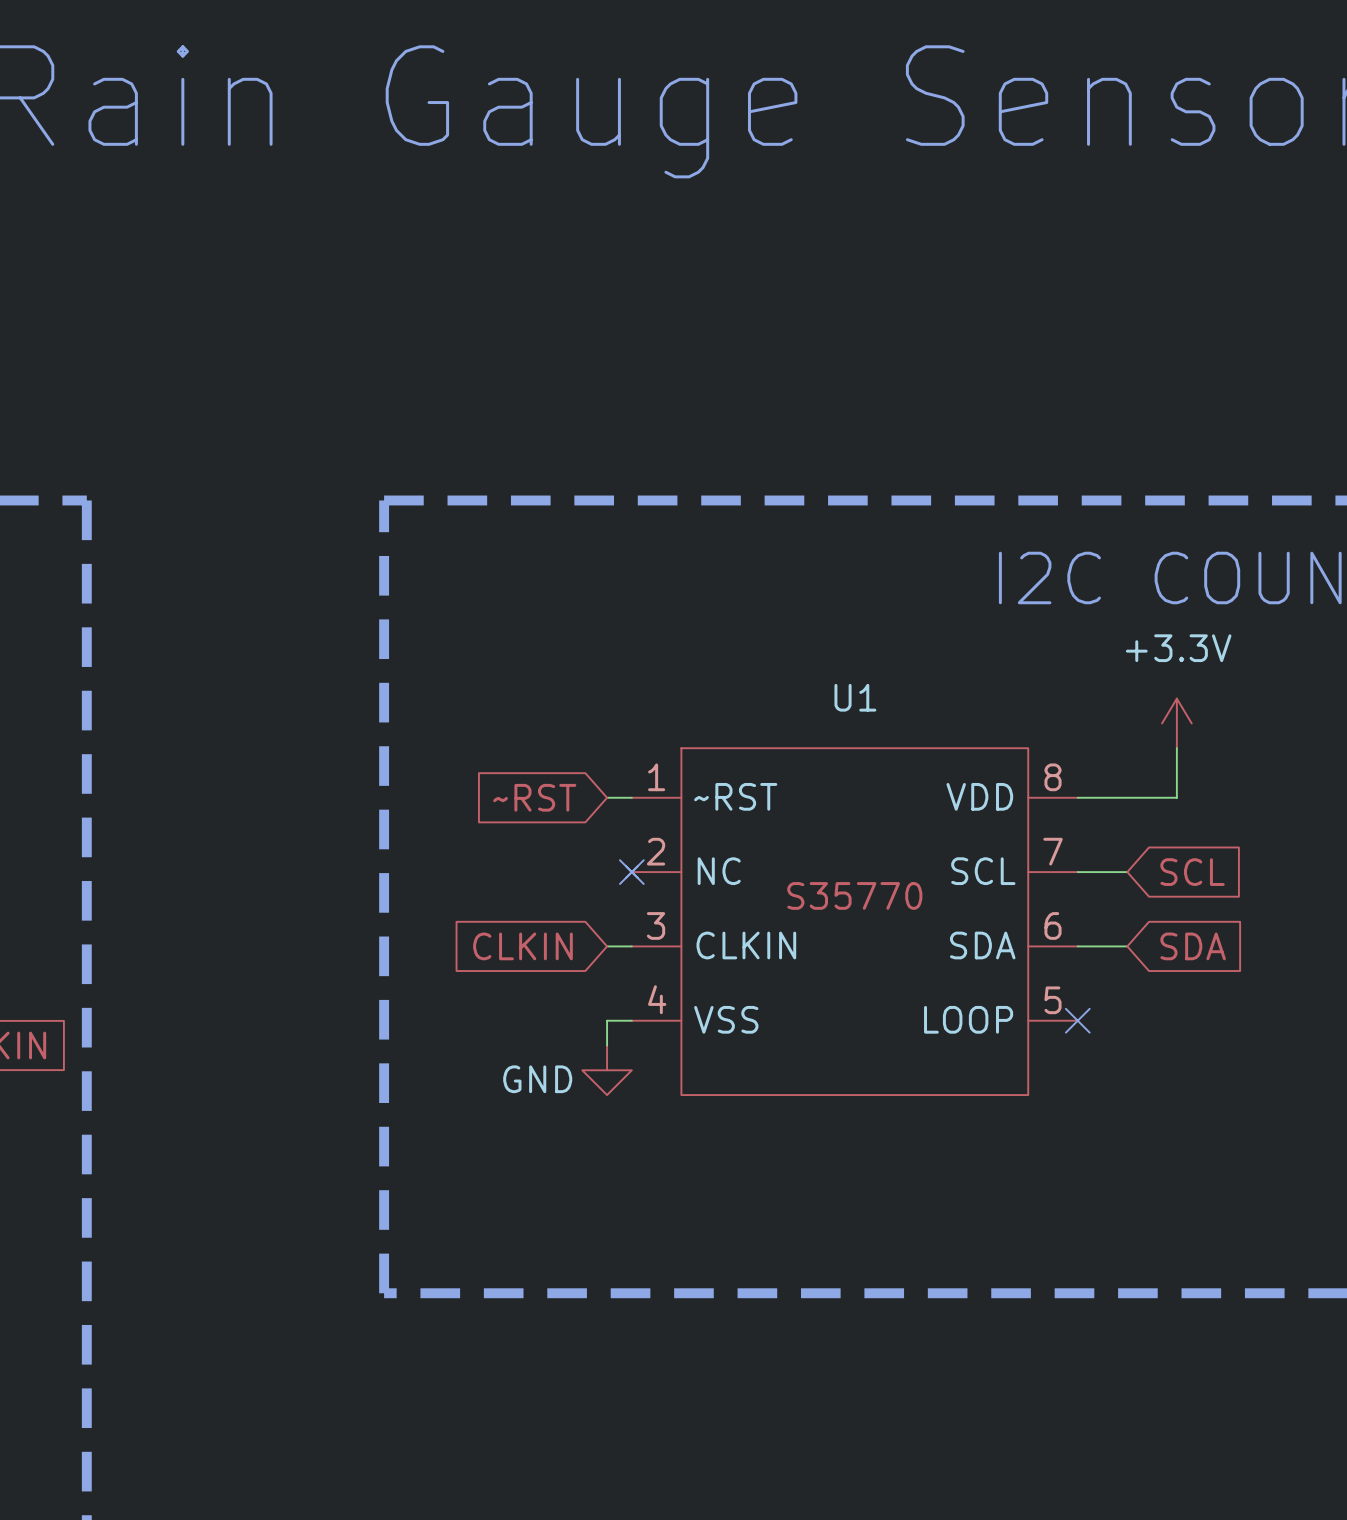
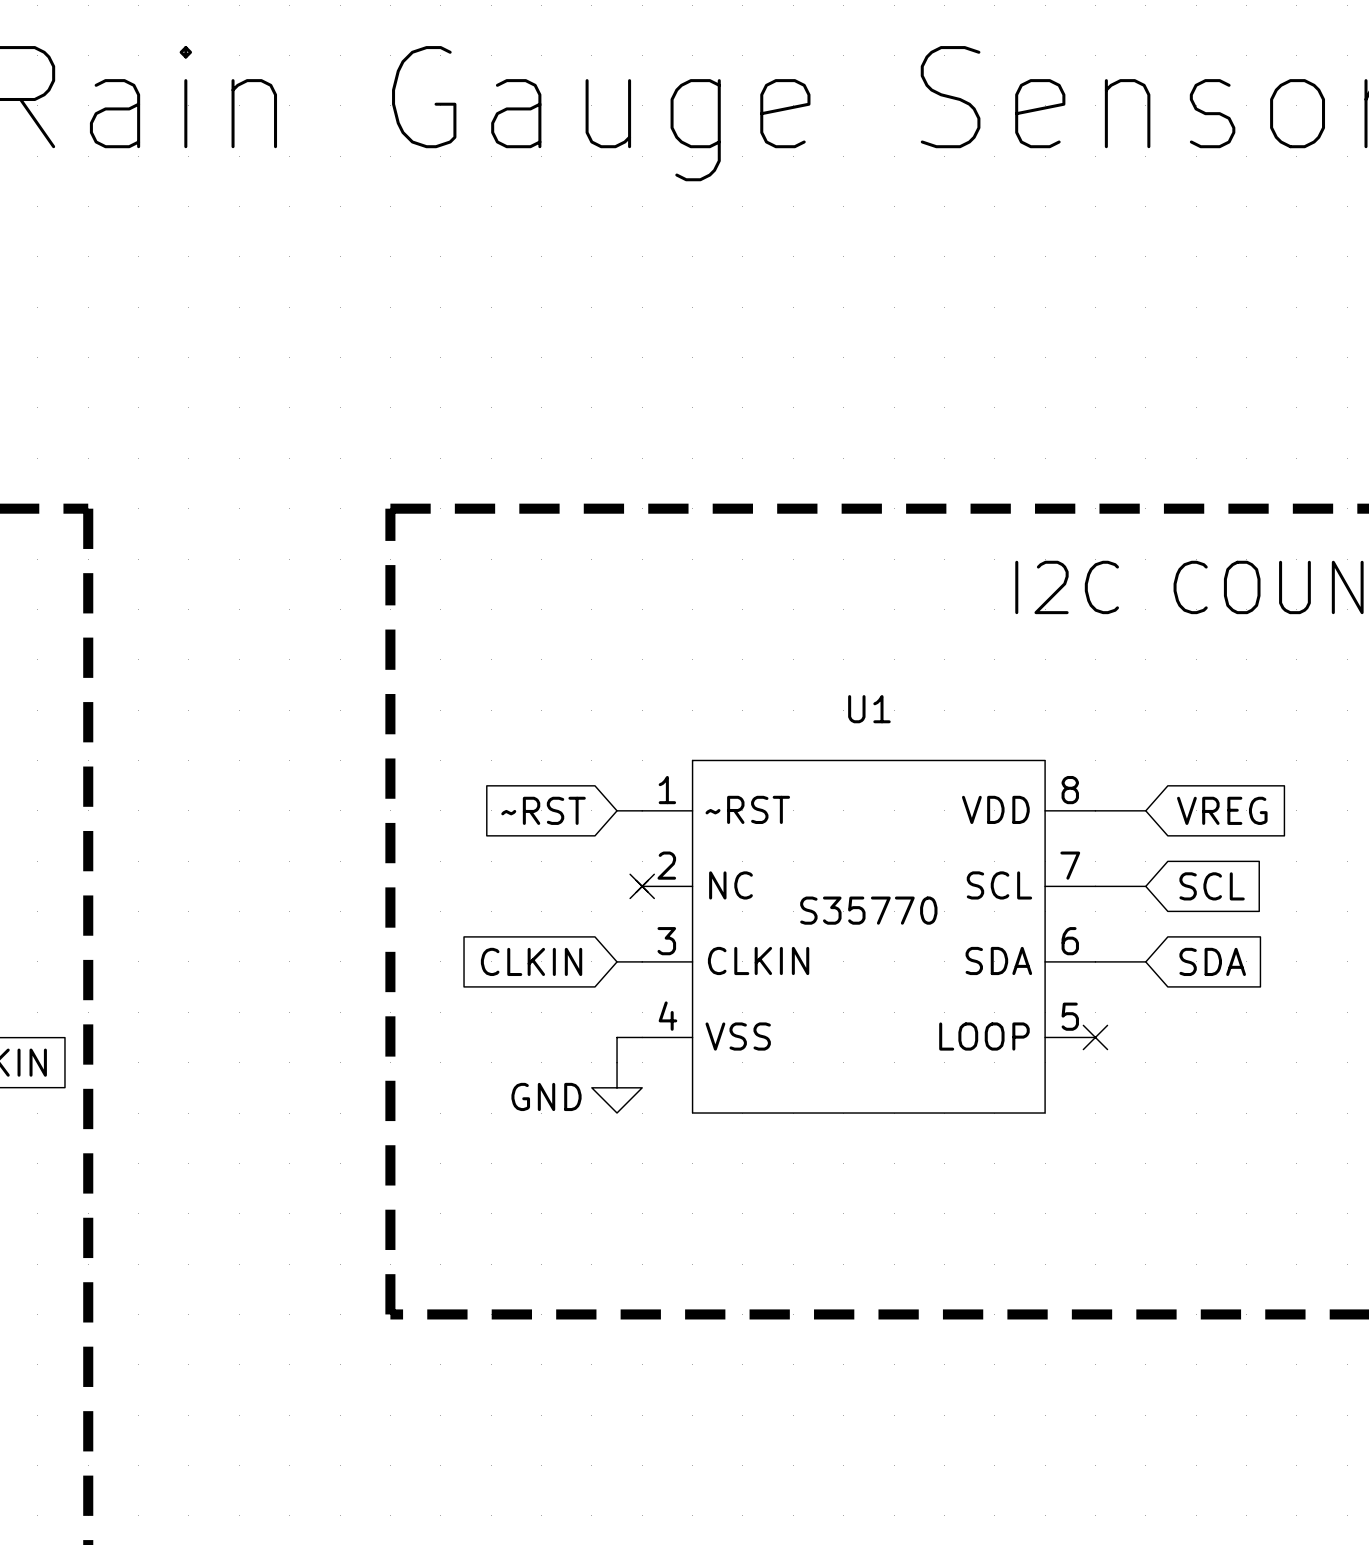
power symbol: +3.3V (1176, 723) -> none
wire: (1176, 748) (1176, 797) (1127, 797) -> none
global label: none -> VREG (1222, 810)

